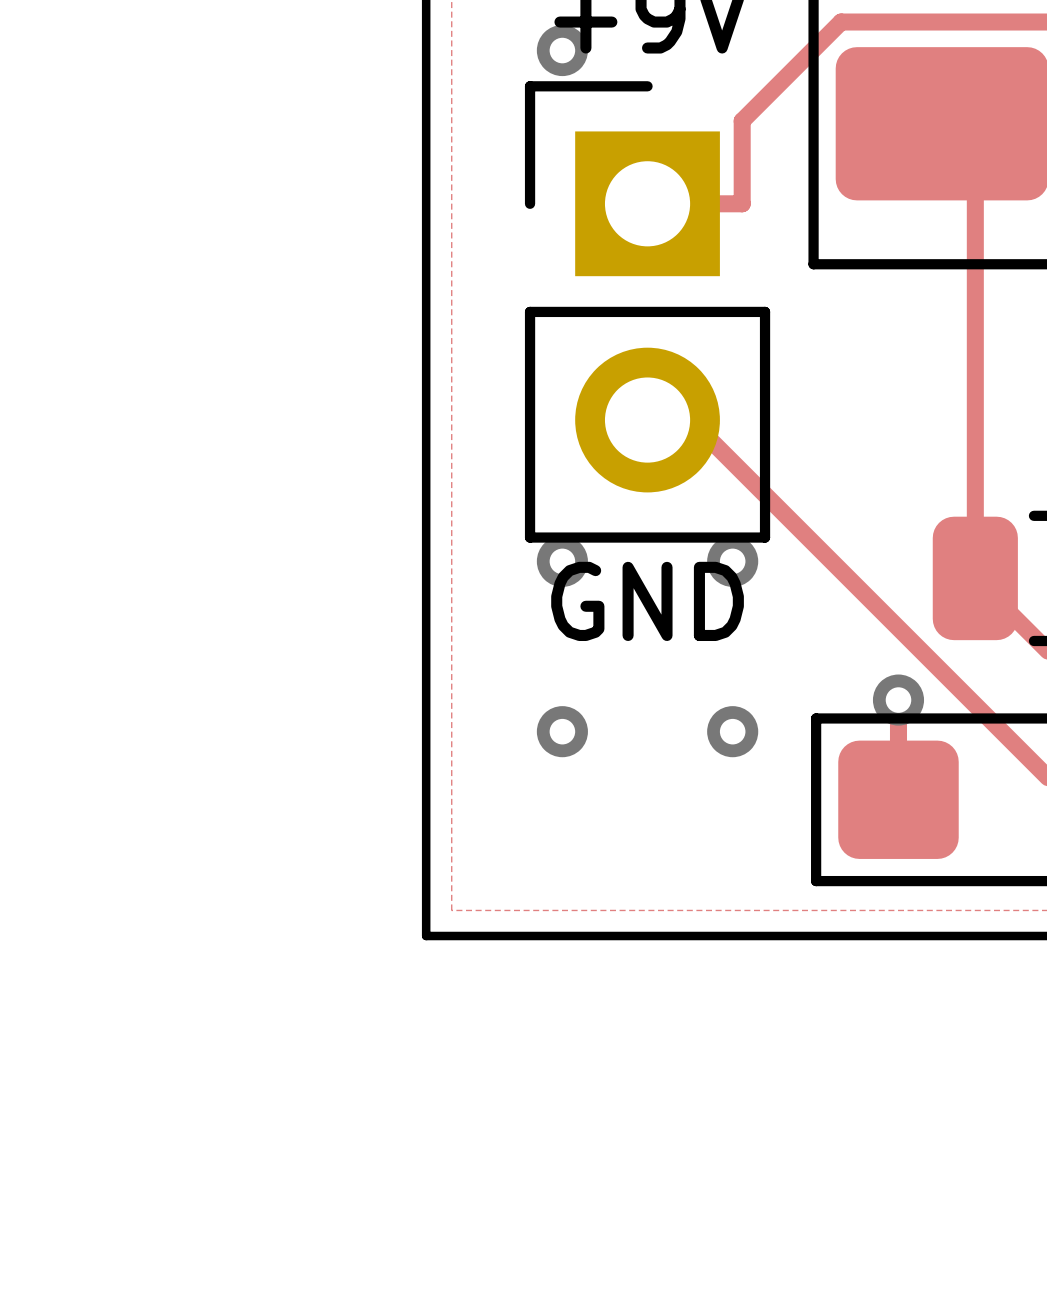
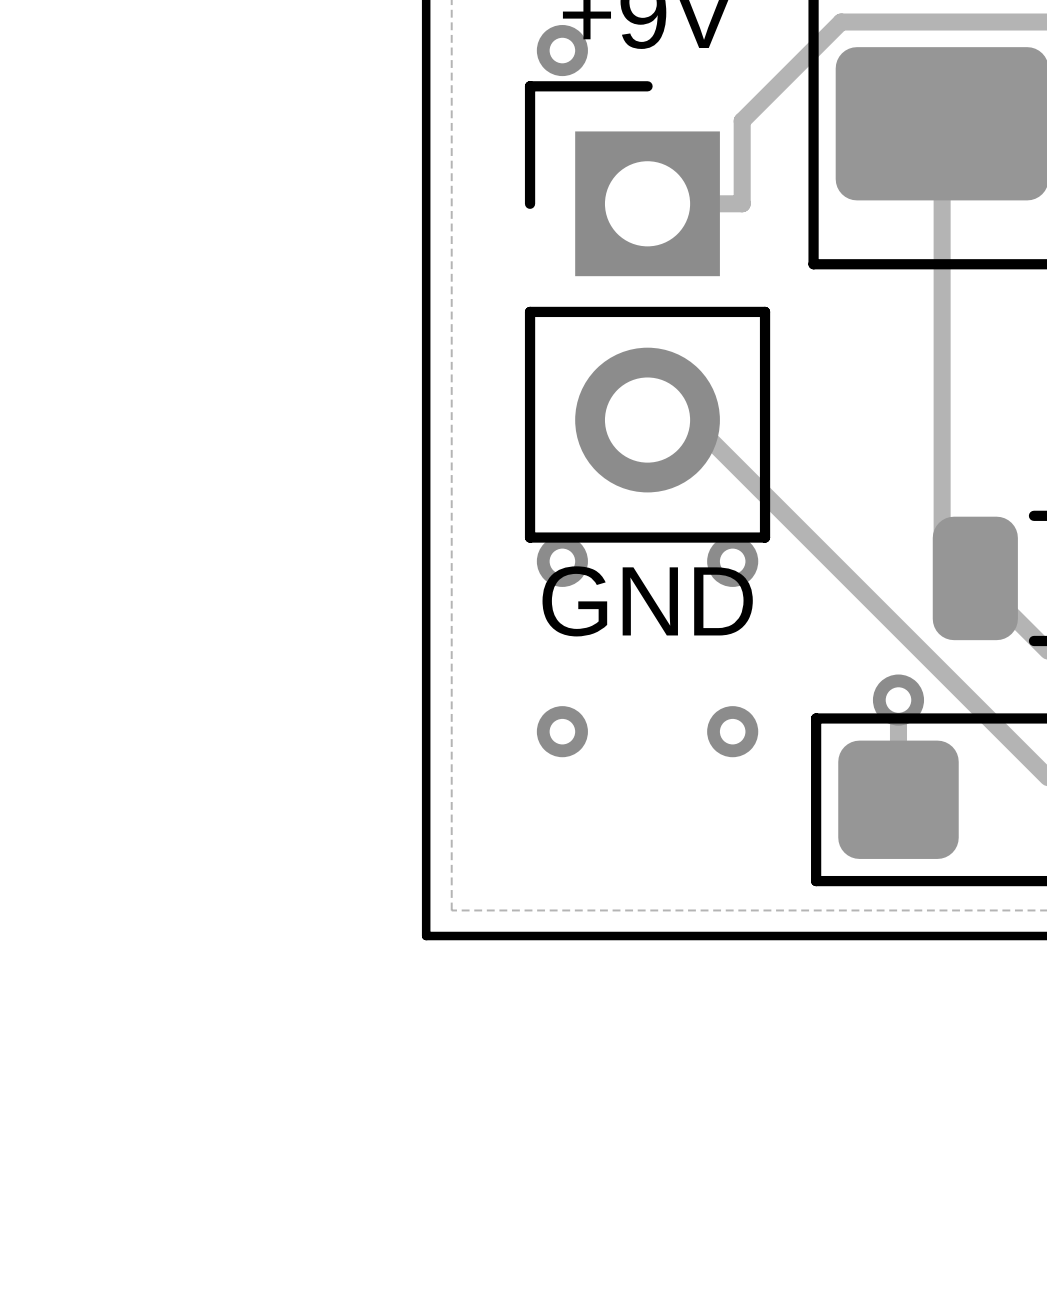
track: (942, 123) (975, 156) (975, 578) -> (942, 123) (942, 545) (975, 578)

